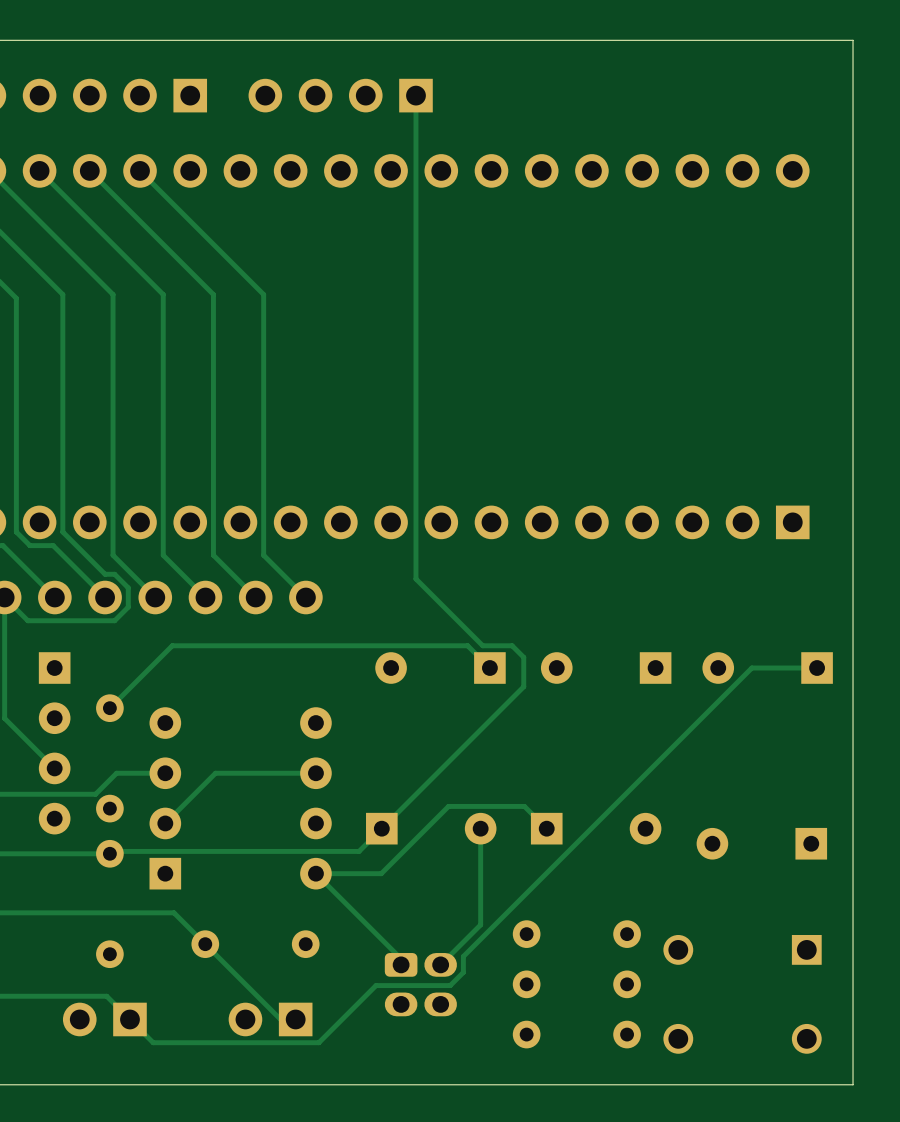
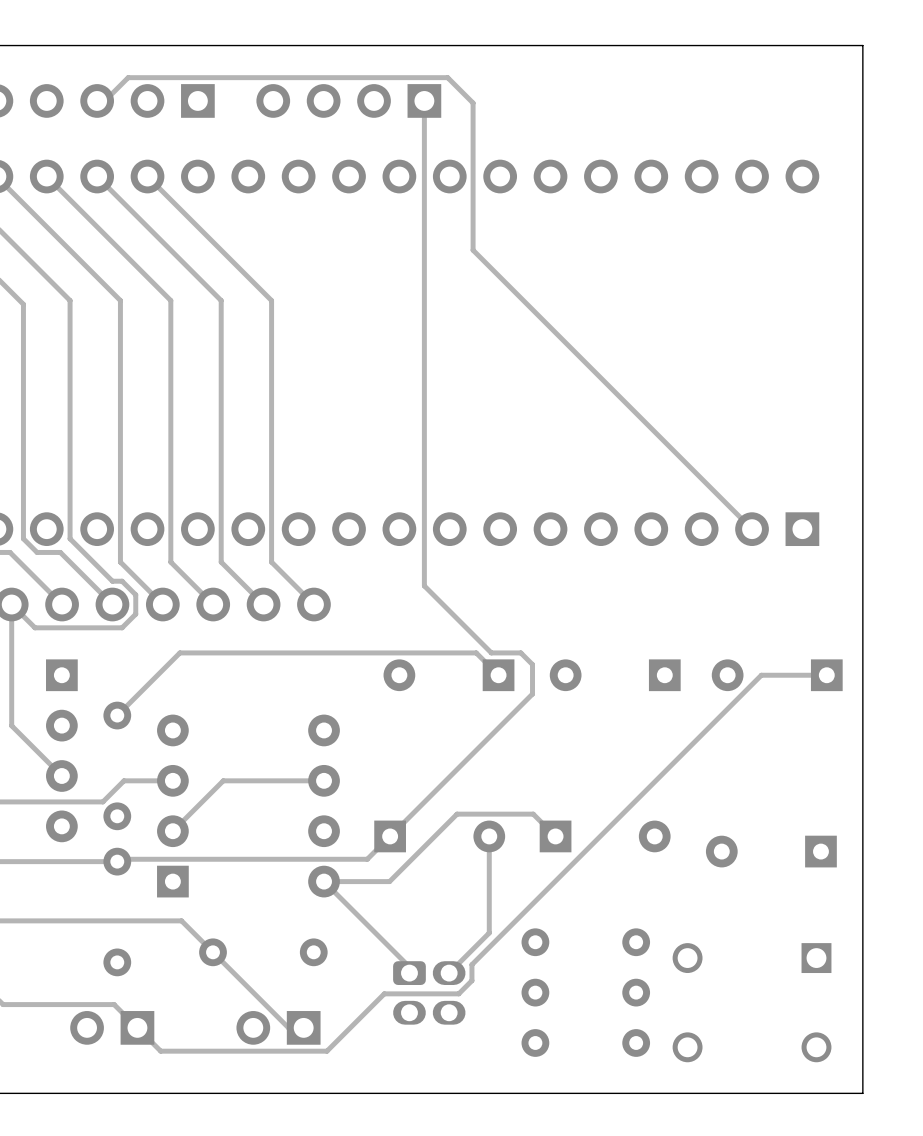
track: none -> (97, 100) (104, 100) (128, 77) (447, 77) (473, 103) (473, 250) (752, 529)

